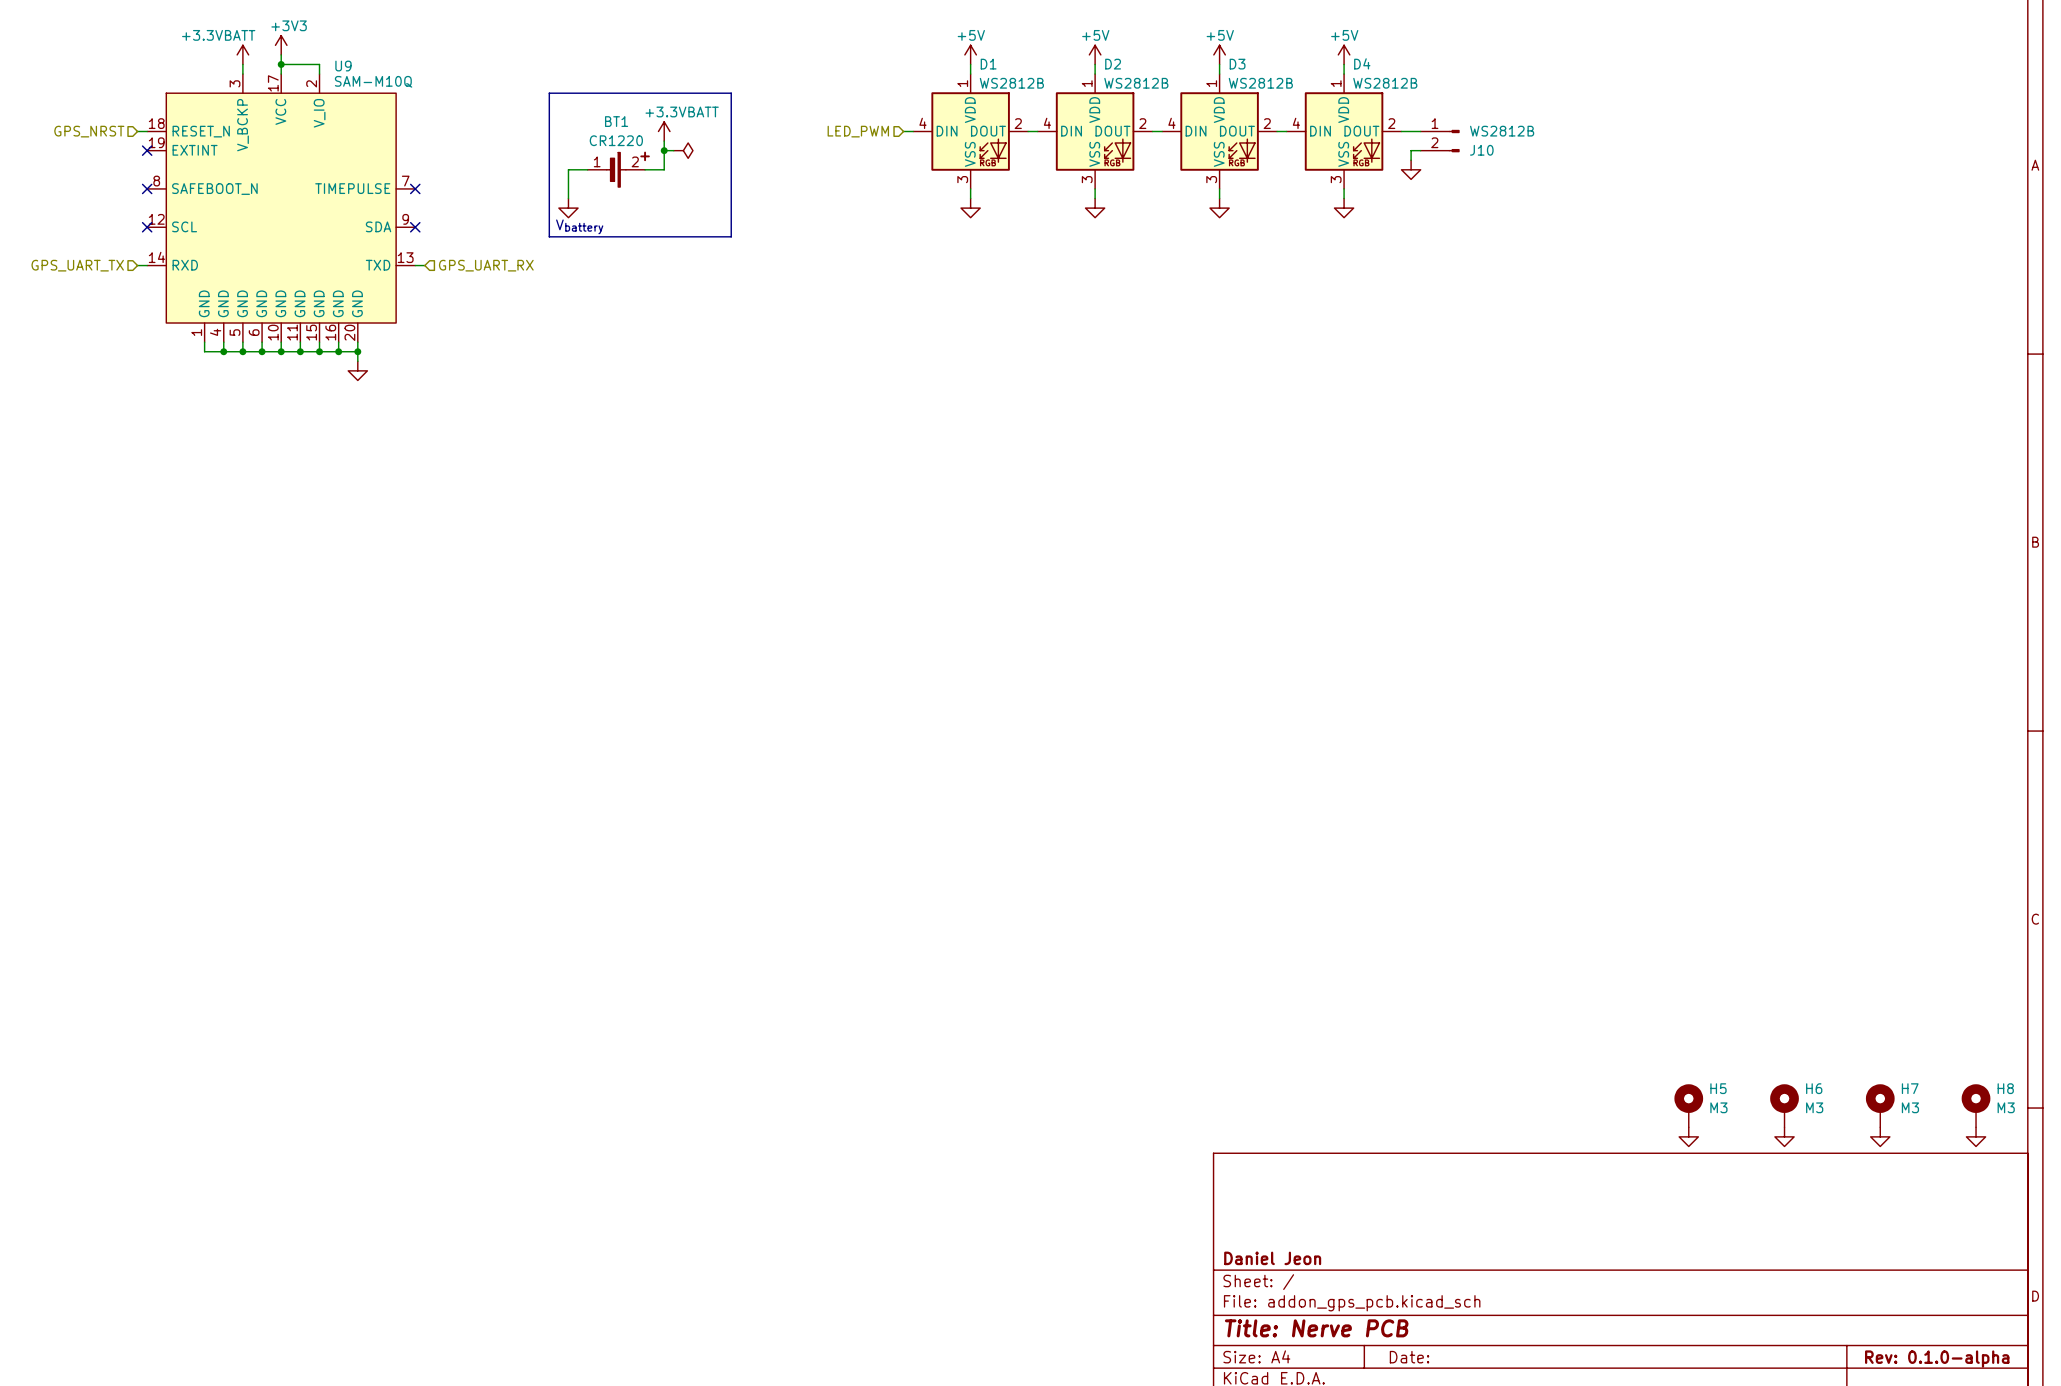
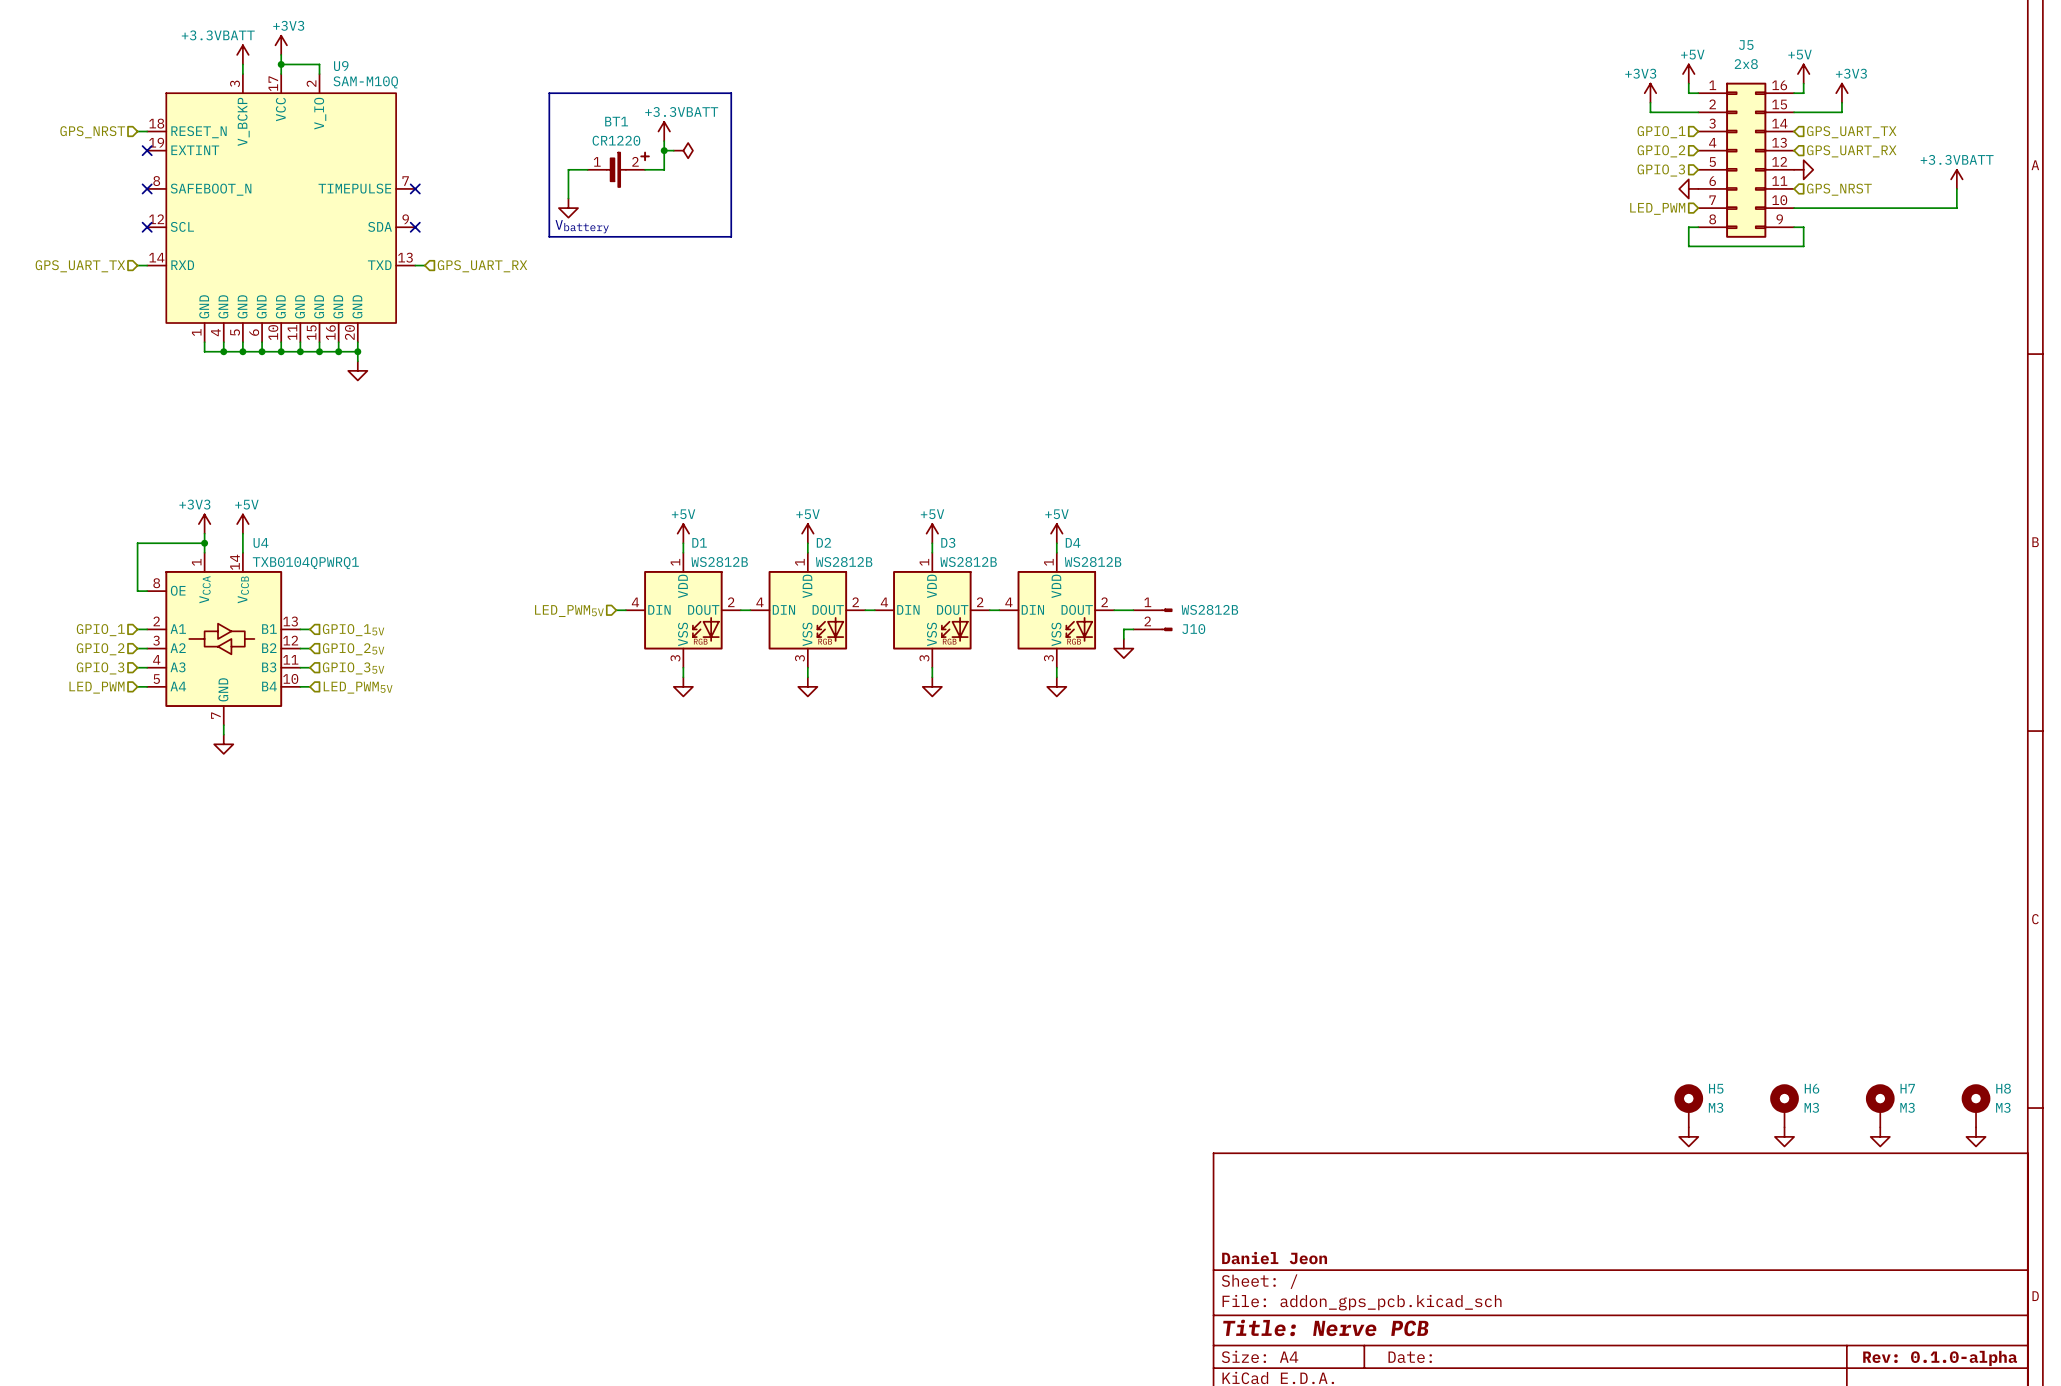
power symbol: +5V (970, 54) -> none
power symbol: +5V (1095, 54) -> none
power symbol: +5V (1219, 54) -> none
power symbol: +5V (1344, 54) -> none
wire: (970, 64) (970, 74) -> none
wire: (1095, 64) (1095, 74) -> none
wire: (1219, 64) (1219, 74) -> none
wire: (1344, 64) (1344, 74) -> none
power symbol: none -> +5V (1688, 74)
power symbol: none -> +5V (1803, 74)
wire: none -> (1688, 83) (1688, 93) (1698, 93)
wire: none -> (1803, 83) (1803, 93) (1794, 93)
power symbol: none -> +3V3 (1650, 93)
power symbol: none -> +3V3 (1841, 93)
wire: none -> (1650, 102) (1650, 112) (1698, 112)
wire: none -> (1841, 102) (1841, 112) (1794, 112)
hierarchical label: LED_PWM (858, 131) -> none
wire: (903, 131) (913, 131) -> none
D1 position: (970, 131) -> (683, 610)
wire: (1028, 131) (1037, 131) -> none
D2 position: (1095, 131) -> (807, 610)
wire: (1152, 131) (1162, 131) -> none
D3 position: (1219, 131) -> (932, 610)
wire: (1277, 131) (1286, 131) -> none
D4 position: (1344, 131) -> (1056, 610)
wire: (1401, 131) (1420, 131) -> none
hierarchical label: none -> GPIO_1 (1661, 132)
hierarchical label: none -> GPS_UART_TX (1851, 132)
J10 position: (1440, 141) -> (1152, 619)
wire: (1420, 150) (1411, 150) (1411, 160) -> none
hierarchical label: none -> GPIO_2 (1661, 151)
hierarchical label: none -> GPS_UART_RX (1851, 151)
J5: none -> 2x8 (1746, 160)
power symbol: (1411, 169) -> none
hierarchical label: none -> GPIO_3 (1661, 170)
power symbol: none -> (1803, 169)
power symbol: none -> +3.3VBATT (1956, 179)
wire: (970, 188) (970, 198) -> none
wire: (1095, 188) (1095, 198) -> none
wire: (1219, 188) (1219, 198) -> none
wire: (1344, 188) (1344, 198) -> none
power symbol: none -> (1688, 188)
wire: none -> (1956, 188) (1956, 208) (1794, 208)
hierarchical label: none -> GPS_NRST (1839, 189)
power symbol: (970, 208) -> none
power symbol: (1095, 208) -> none
power symbol: (1219, 208) -> none
power symbol: (1344, 208) -> none
hierarchical label: none -> LED_PWM (1657, 208)
wire: none -> (1698, 227) (1688, 227) (1688, 246) (1803, 246) (1803, 227) (1794, 227)
power symbol: none -> +3V3 (204, 524)
power symbol: none -> +5V (242, 524)
wire: none -> (204, 533) (204, 552)
wire: none -> (242, 533) (242, 552)
power symbol: none -> +5V (683, 533)
power symbol: none -> +5V (807, 533)
power symbol: none -> +5V (932, 533)
power symbol: none -> +5V (1056, 533)
wire: none -> (204, 543) (137, 543) (137, 591) (147, 591)
junction: none -> (204, 543)
wire: none -> (683, 543) (683, 552)
wire: none -> (807, 543) (807, 552)
wire: none -> (932, 543) (932, 552)
wire: none -> (1056, 543) (1056, 552)
hierarchical label: none -> LED_PWM5V (569, 611)
wire: none -> (616, 610) (625, 610)
wire: none -> (740, 610) (750, 610)
wire: none -> (865, 610) (874, 610)
wire: none -> (989, 610) (999, 610)
wire: none -> (1114, 610) (1133, 610)
hierarchical label: none -> GPIO_1 (100, 630)
wire: none -> (137, 629) (147, 629)
wire: none -> (300, 629) (309, 629)
hierarchical label: none -> GPIO_15V (353, 630)
wire: none -> (1133, 629) (1123, 629) (1123, 638)
U4: none -> TXB0104QPWRQ1 (223, 638)
hierarchical label: none -> GPIO_2 (100, 649)
wire: none -> (137, 648) (147, 648)
wire: none -> (300, 648) (309, 648)
hierarchical label: none -> GPIO_25V (353, 649)
power symbol: none -> (1123, 648)
hierarchical label: none -> GPIO_3 (100, 668)
wire: none -> (137, 667) (147, 667)
wire: none -> (300, 667) (309, 667)
wire: none -> (683, 667) (683, 677)
wire: none -> (807, 667) (807, 677)
wire: none -> (932, 667) (932, 677)
wire: none -> (1056, 667) (1056, 677)
hierarchical label: none -> GPIO_35V (353, 668)
hierarchical label: none -> LED_PWM (96, 687)
wire: none -> (137, 686) (147, 686)
wire: none -> (300, 686) (309, 686)
power symbol: none -> (683, 686)
power symbol: none -> (807, 686)
power symbol: none -> (932, 686)
power symbol: none -> (1056, 686)
hierarchical label: none -> LED_PWM5V (358, 687)
wire: none -> (223, 725) (223, 734)
power symbol: none -> (223, 744)

